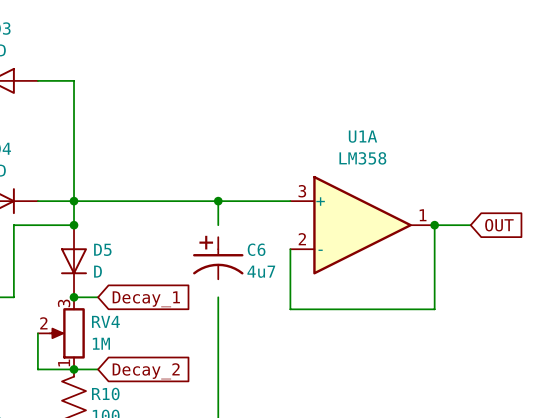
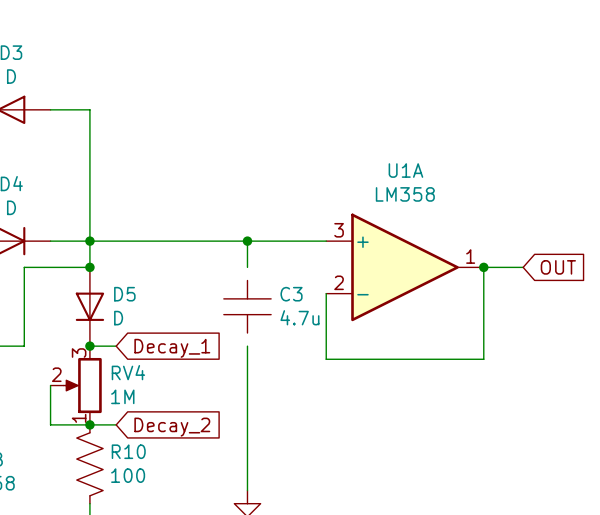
C6: 4u7 (218, 258) -> none
C3: none -> 4.7u (247, 306)

